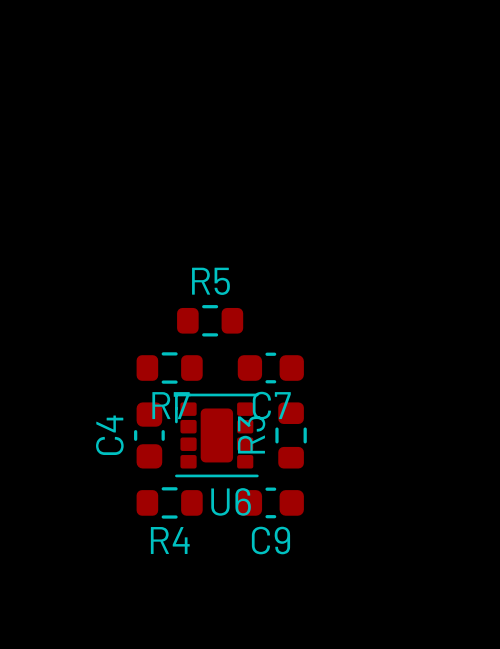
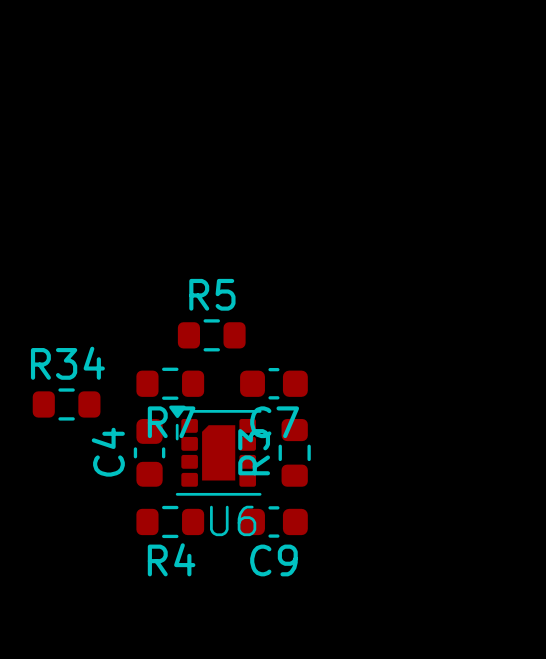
R34: none -> (66, 404)
U6 footprint: [175, 393, 259, 478] -> [169, 405, 262, 496]

